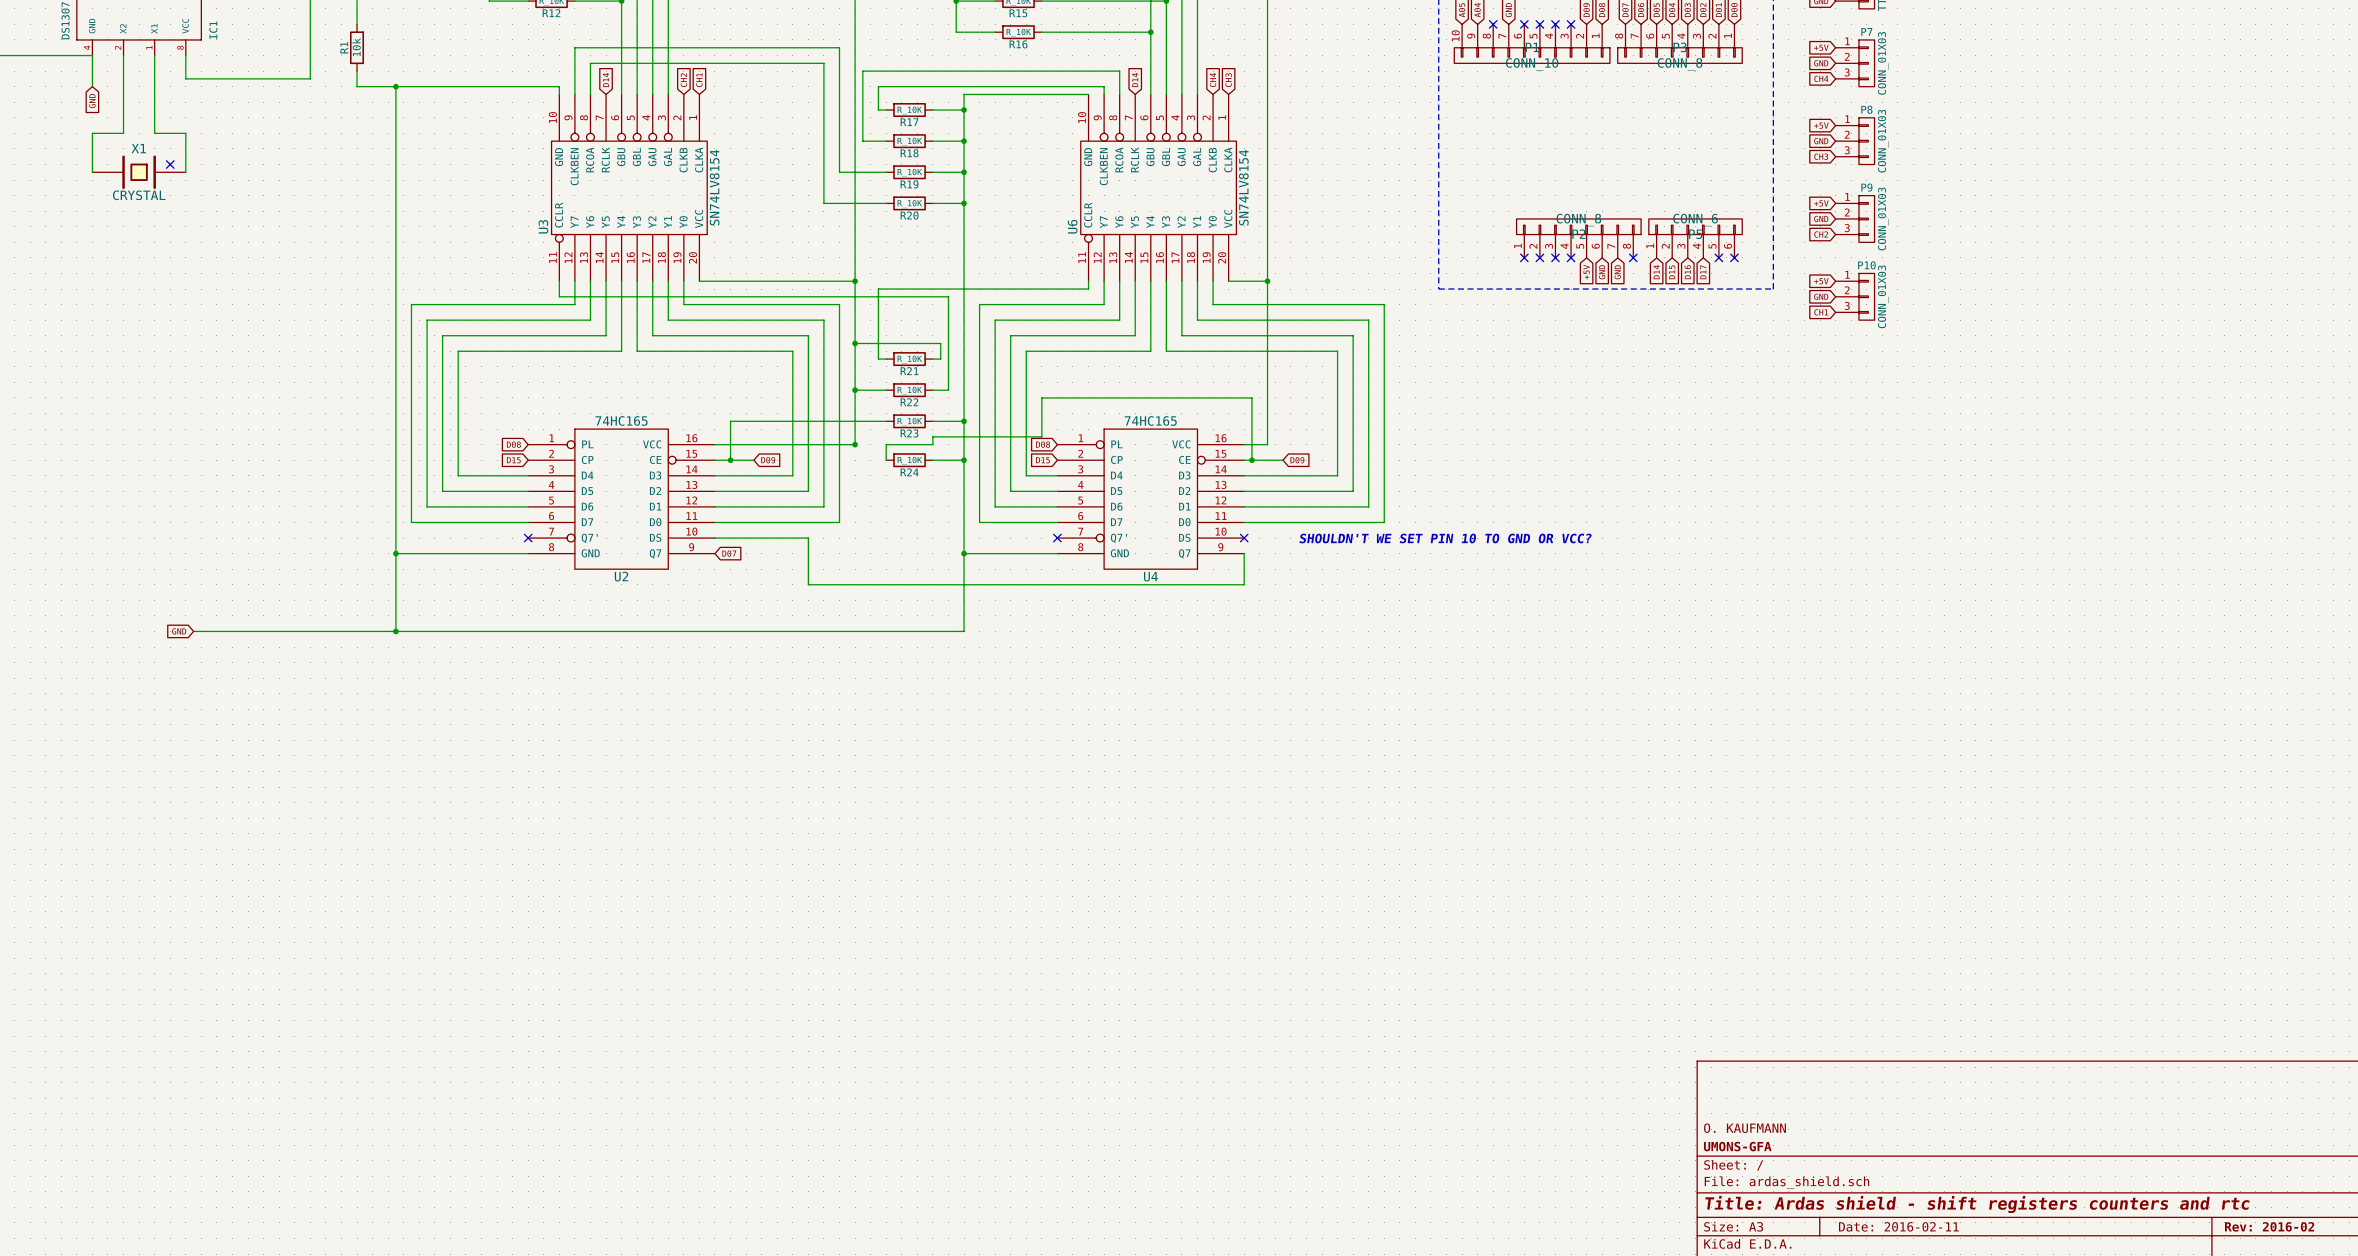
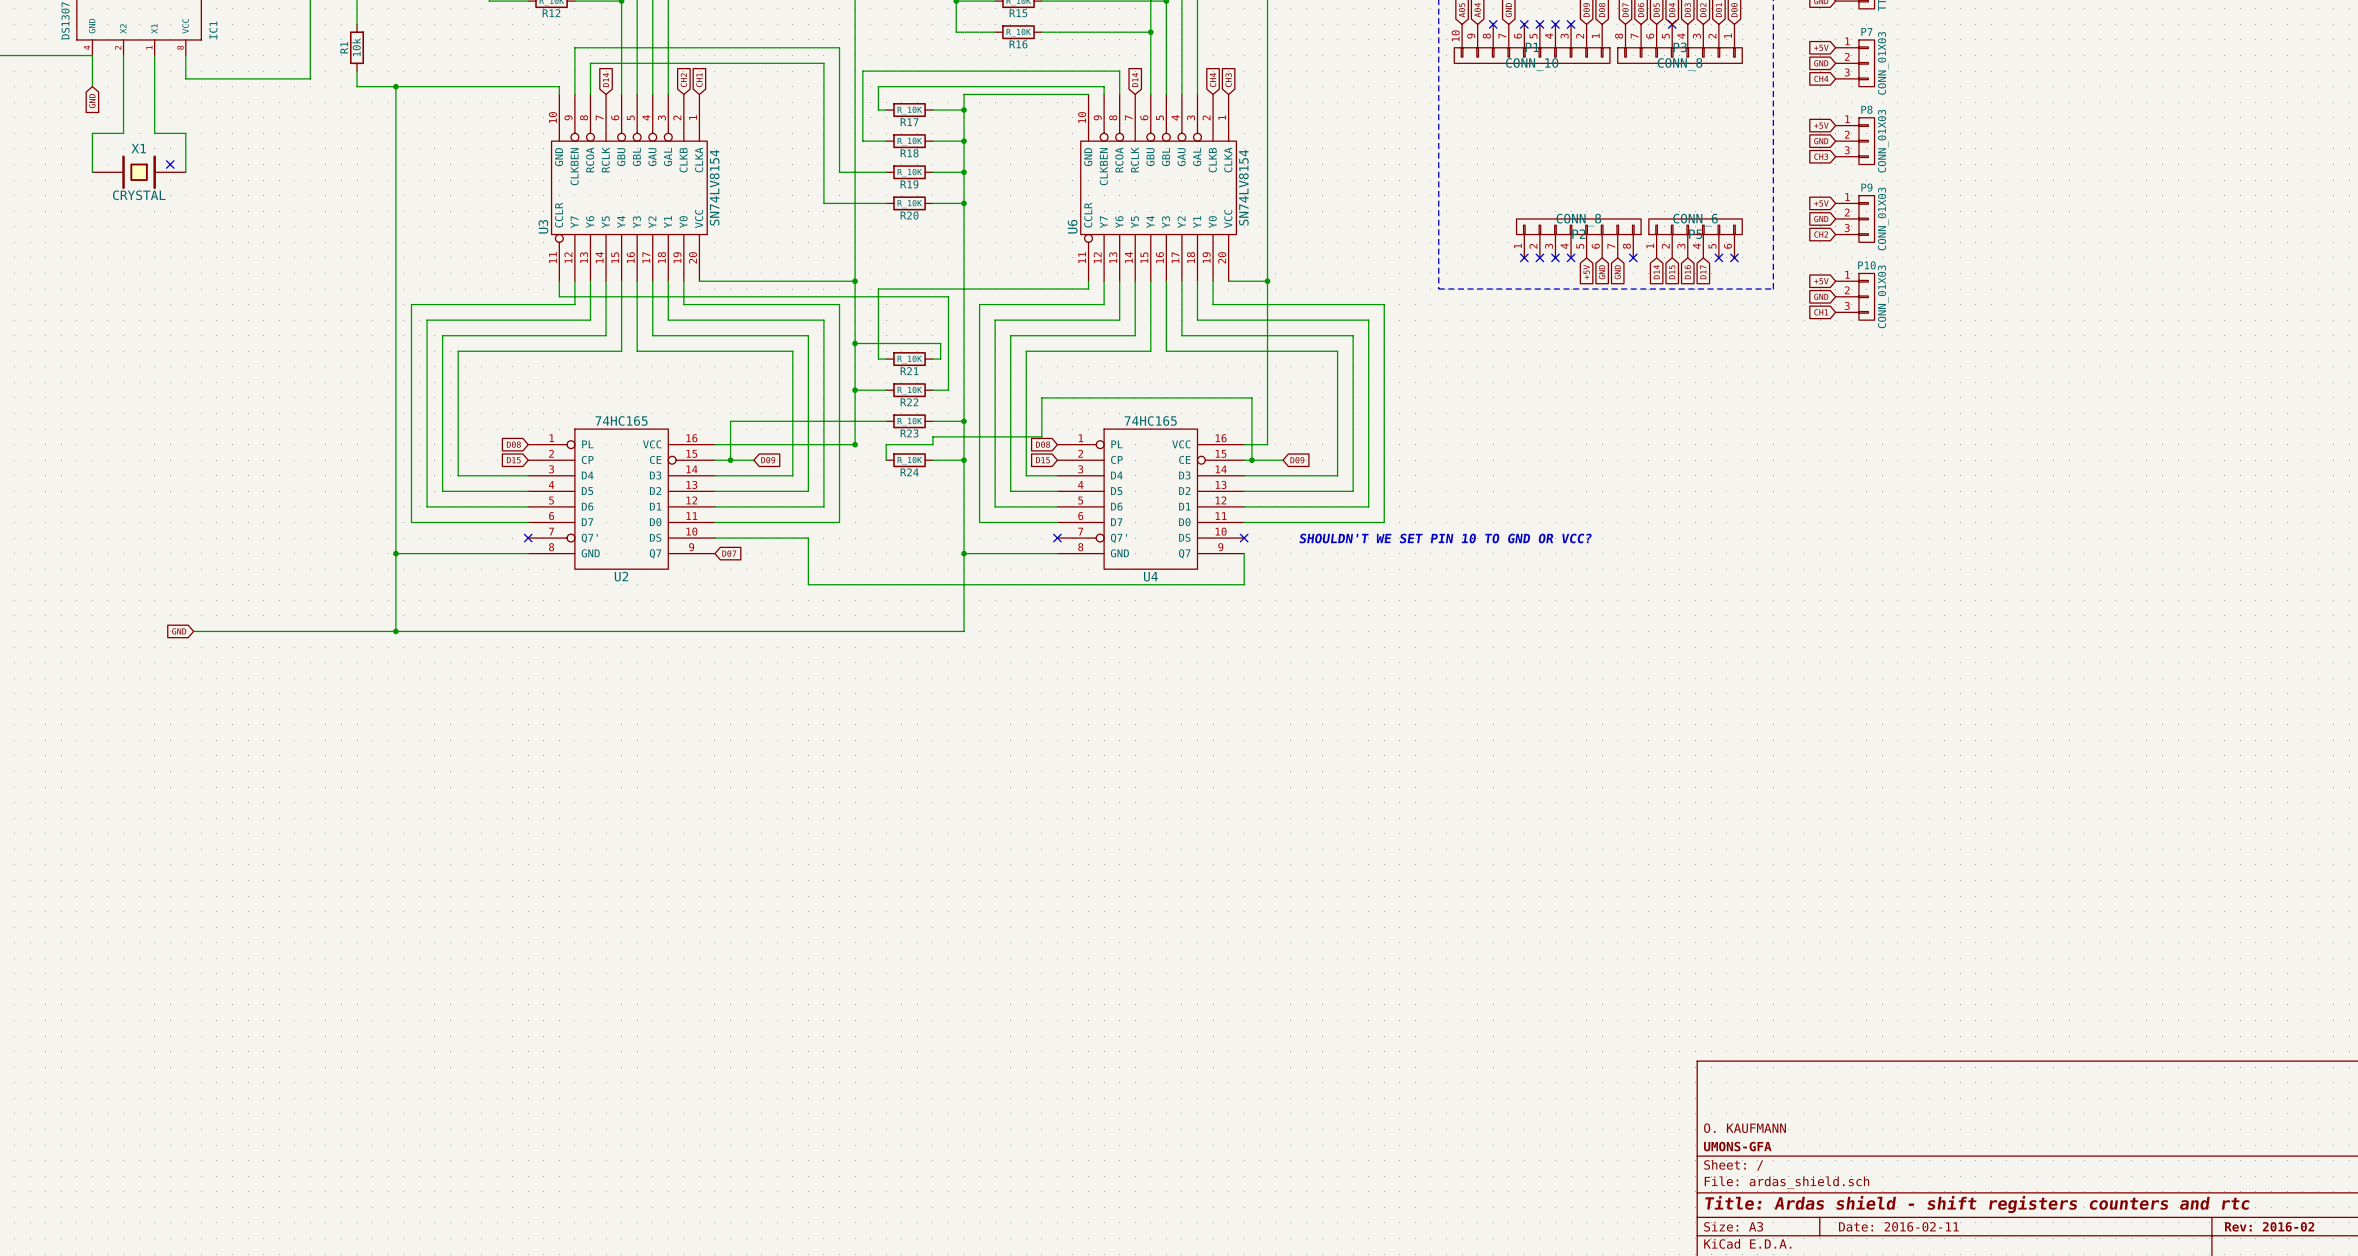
no-connect mark: none -> (1672, 24)

